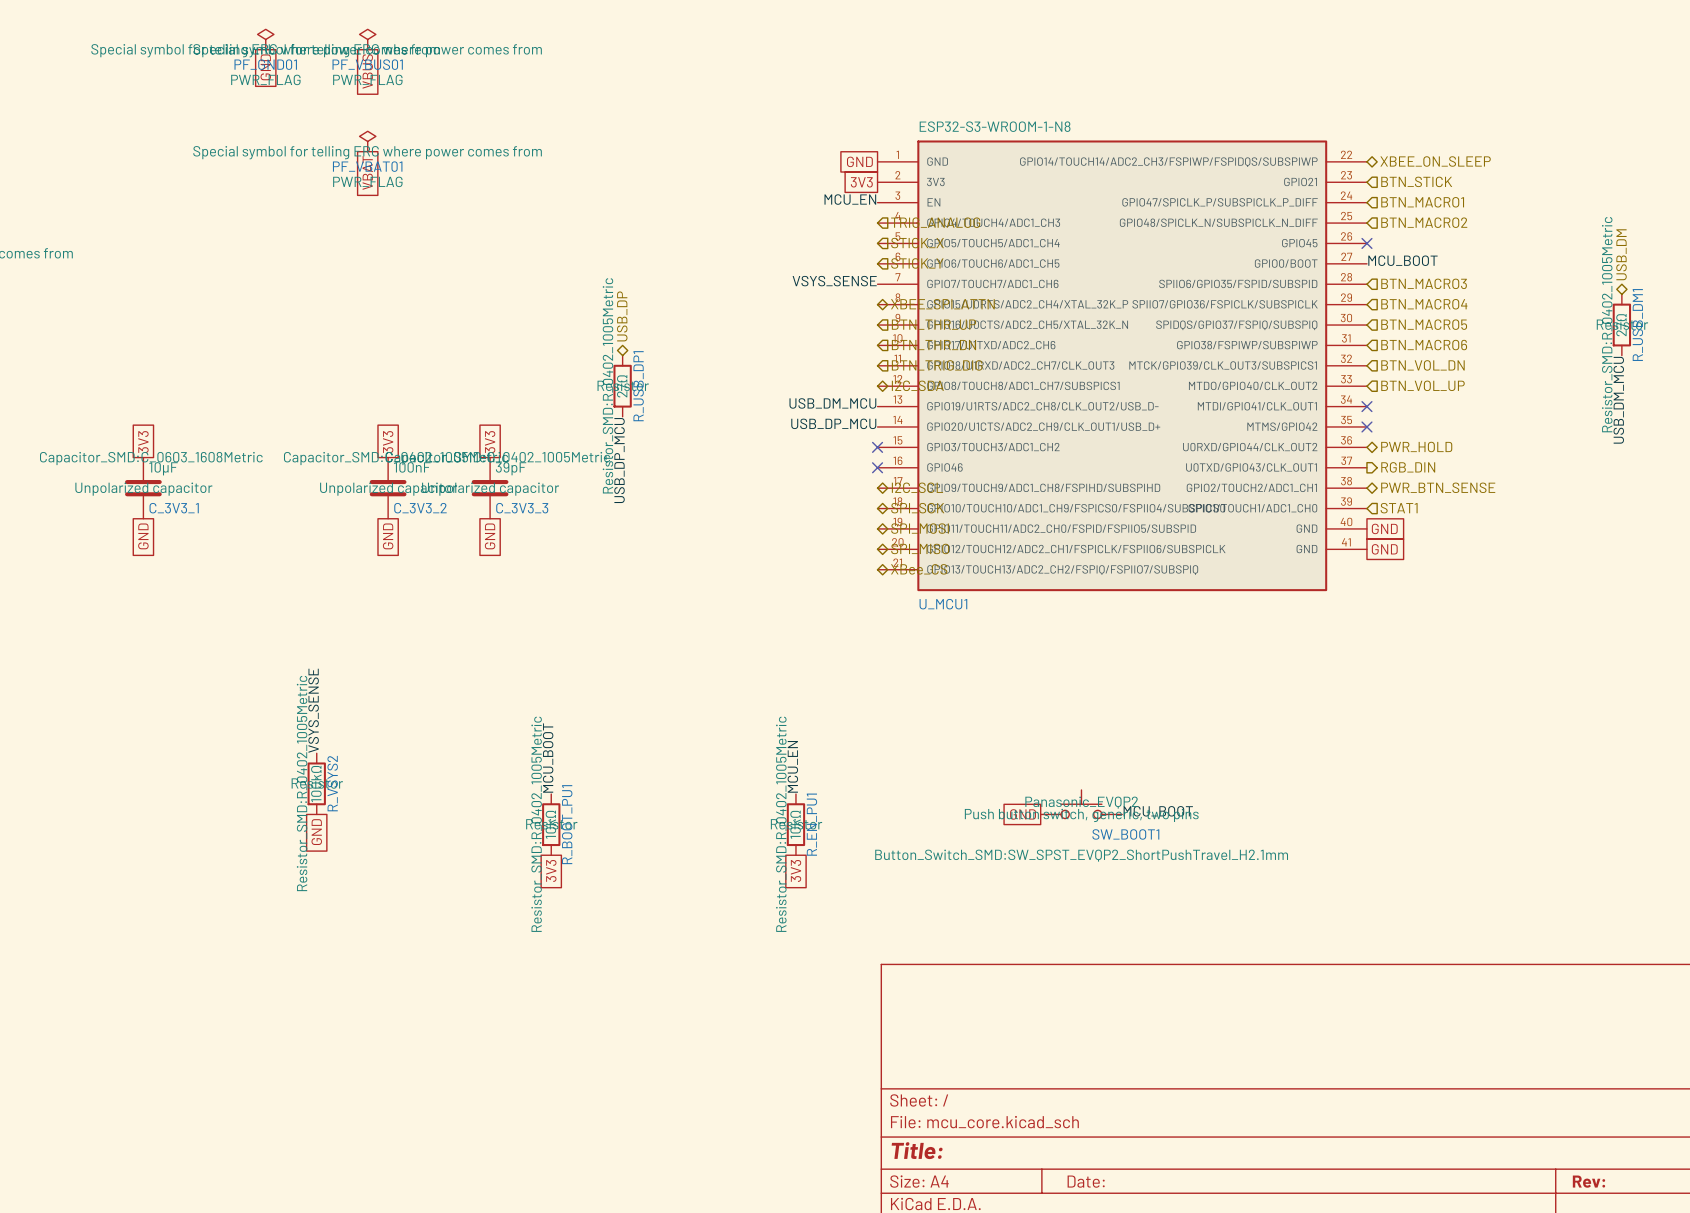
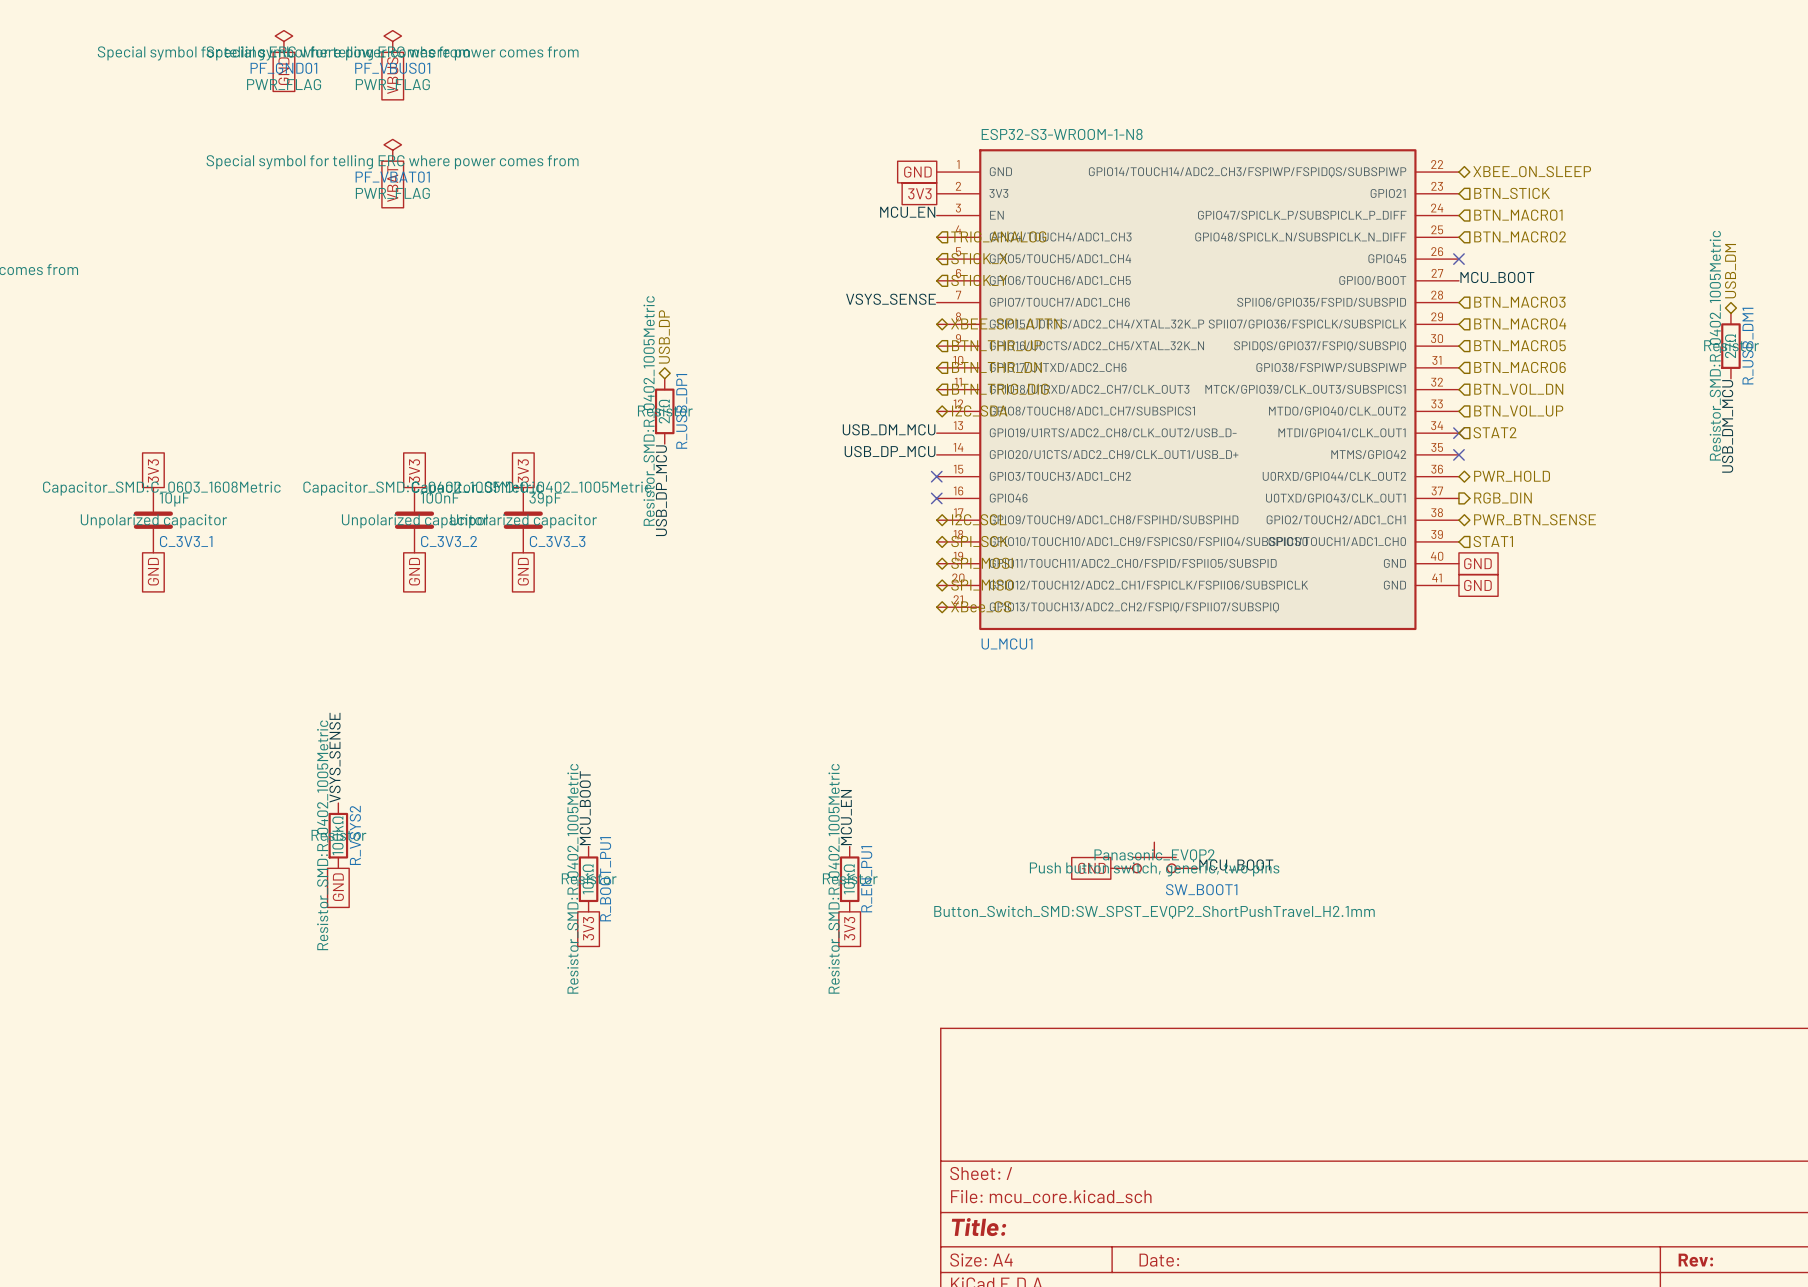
hierarchical label: none -> STAT2 (1495, 432)

